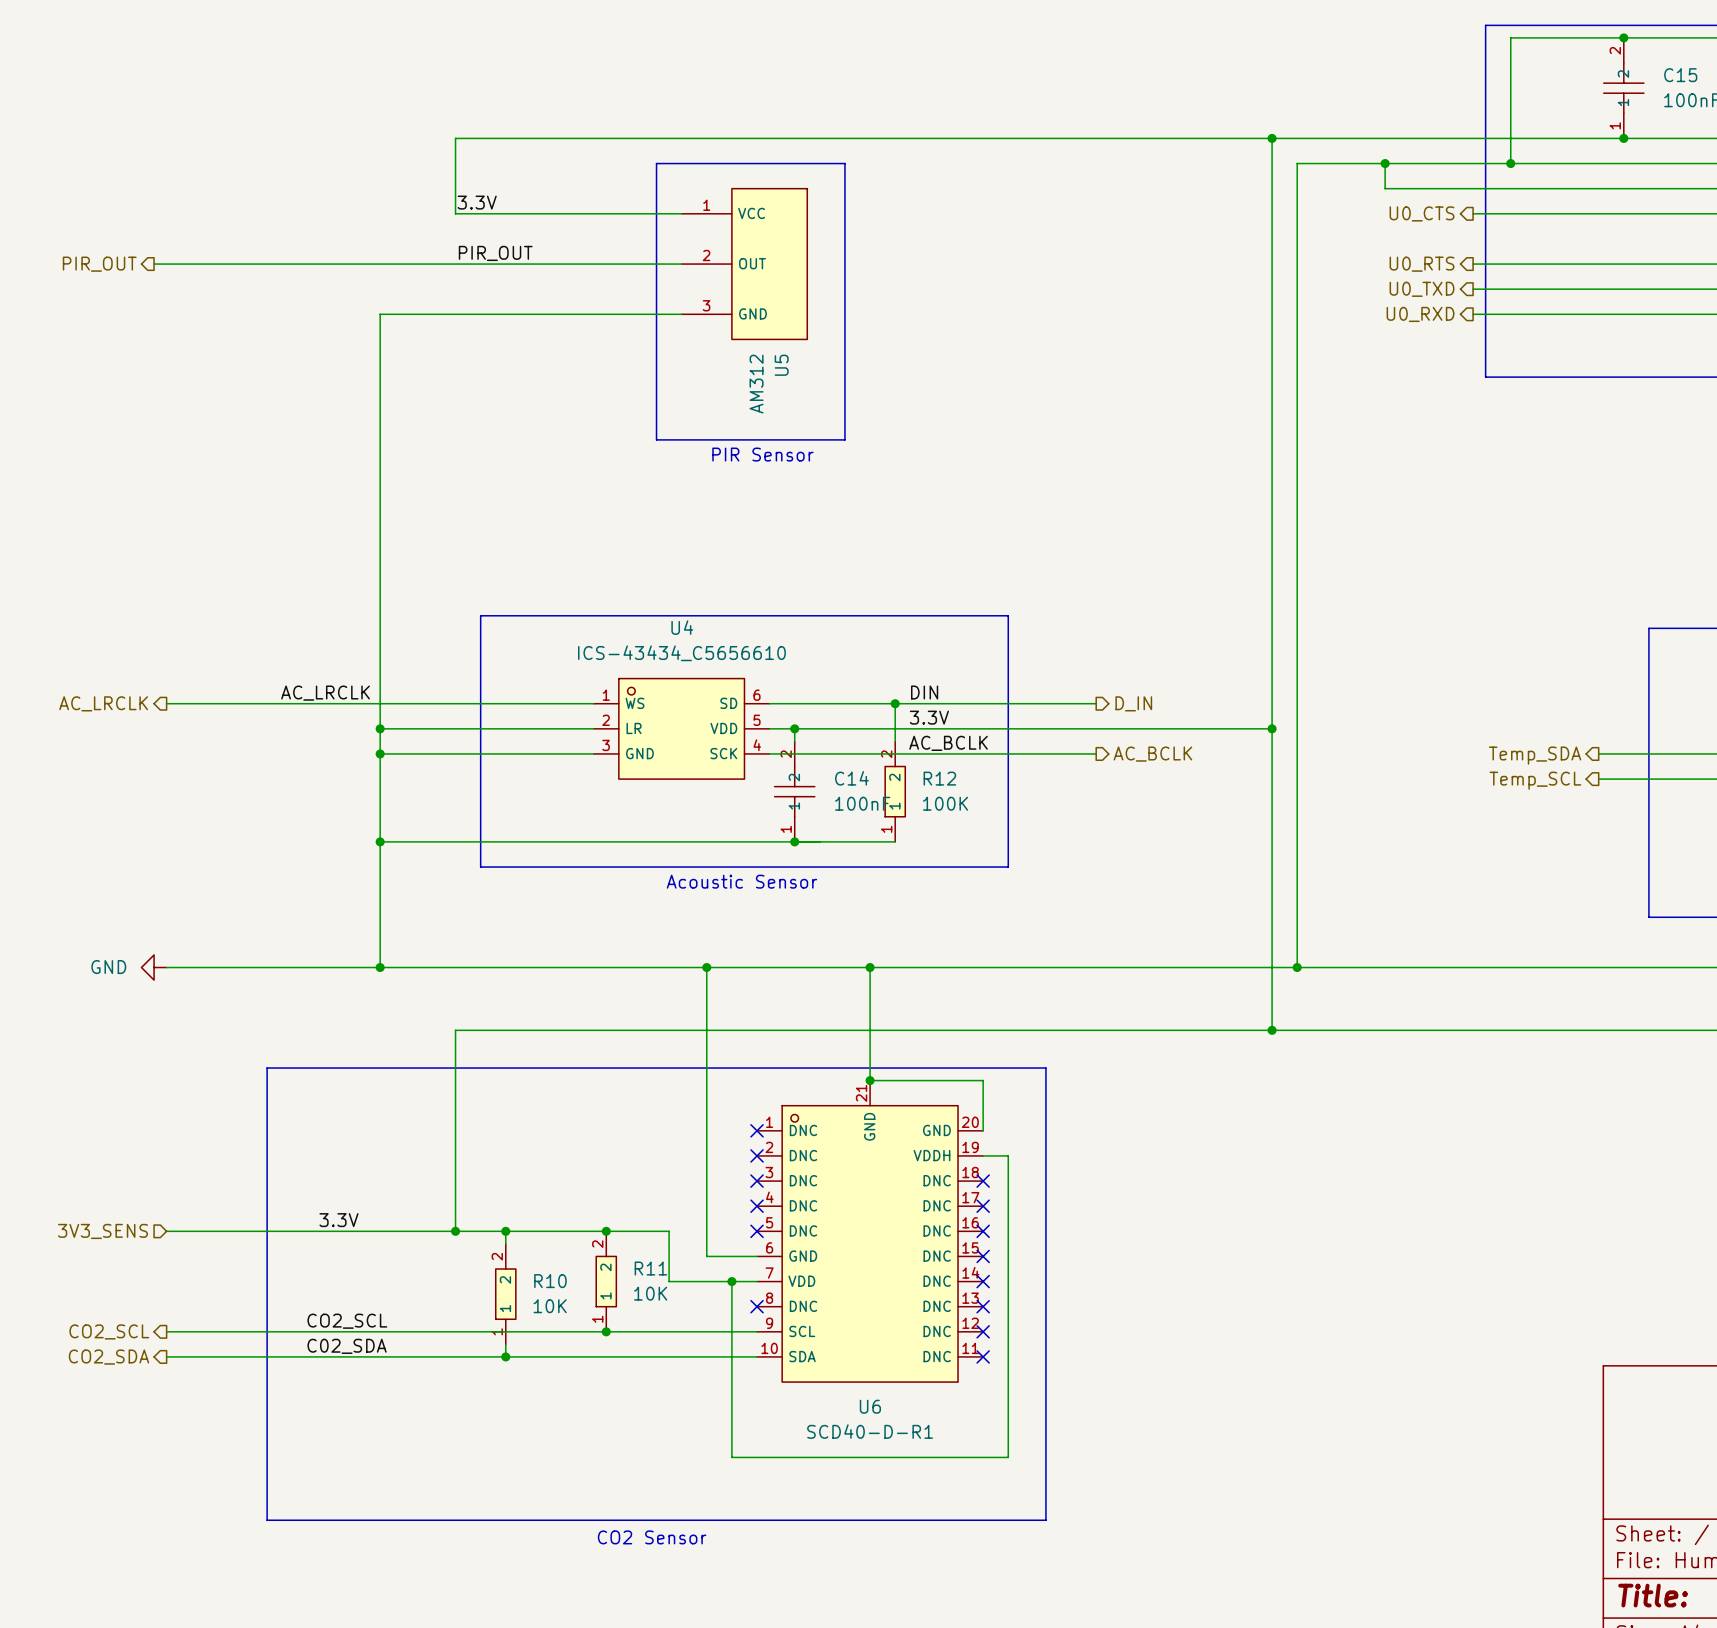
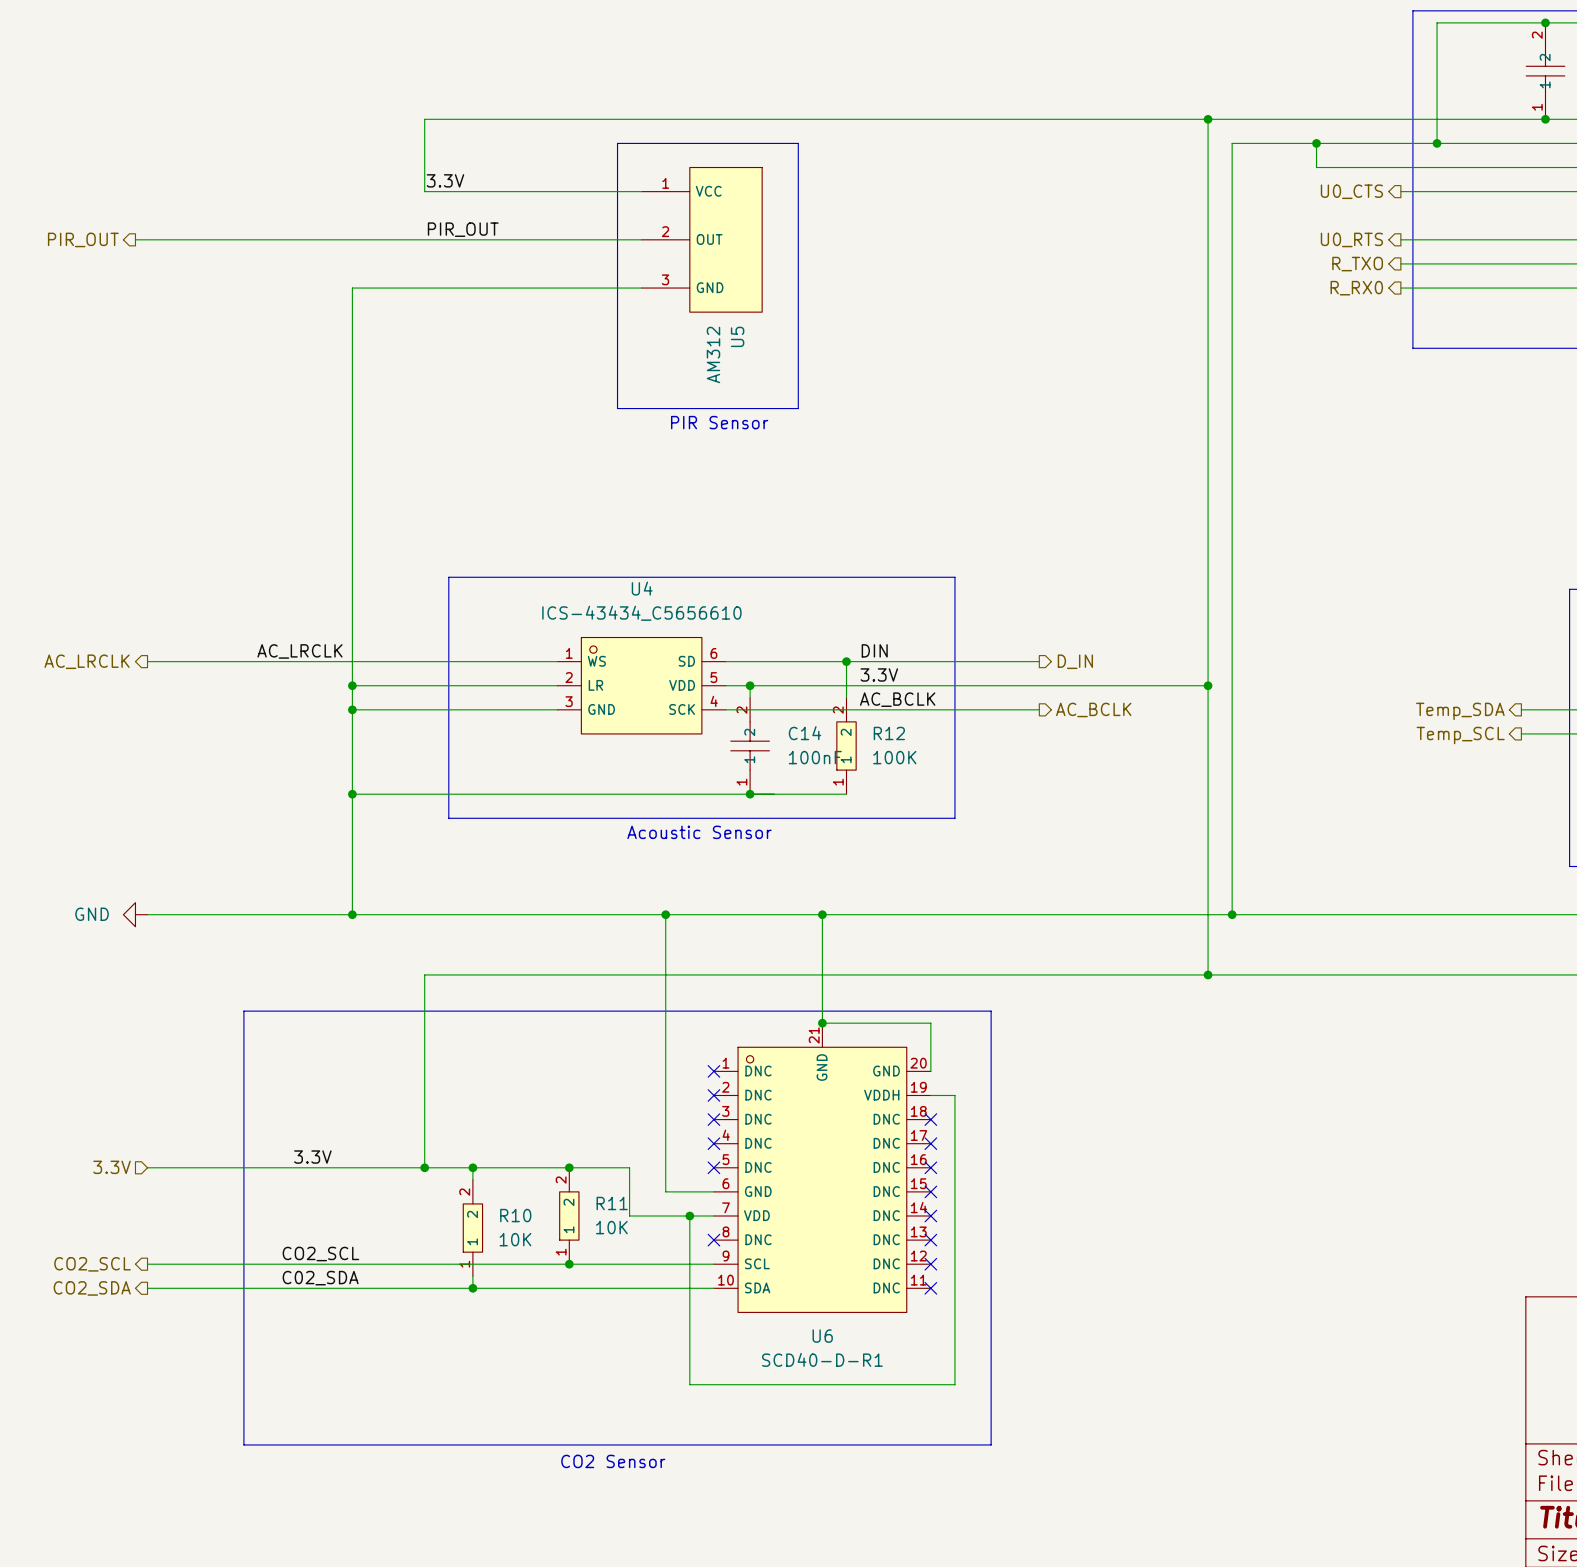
hierarchical label: U0_TXD (1422, 289) -> R_TXO (1357, 264)
hierarchical label: U0_RXD (1420, 314) -> R_RX0 (1356, 288)
hierarchical label: 3V3_SENS (103, 1231) -> 3.3V (112, 1167)

